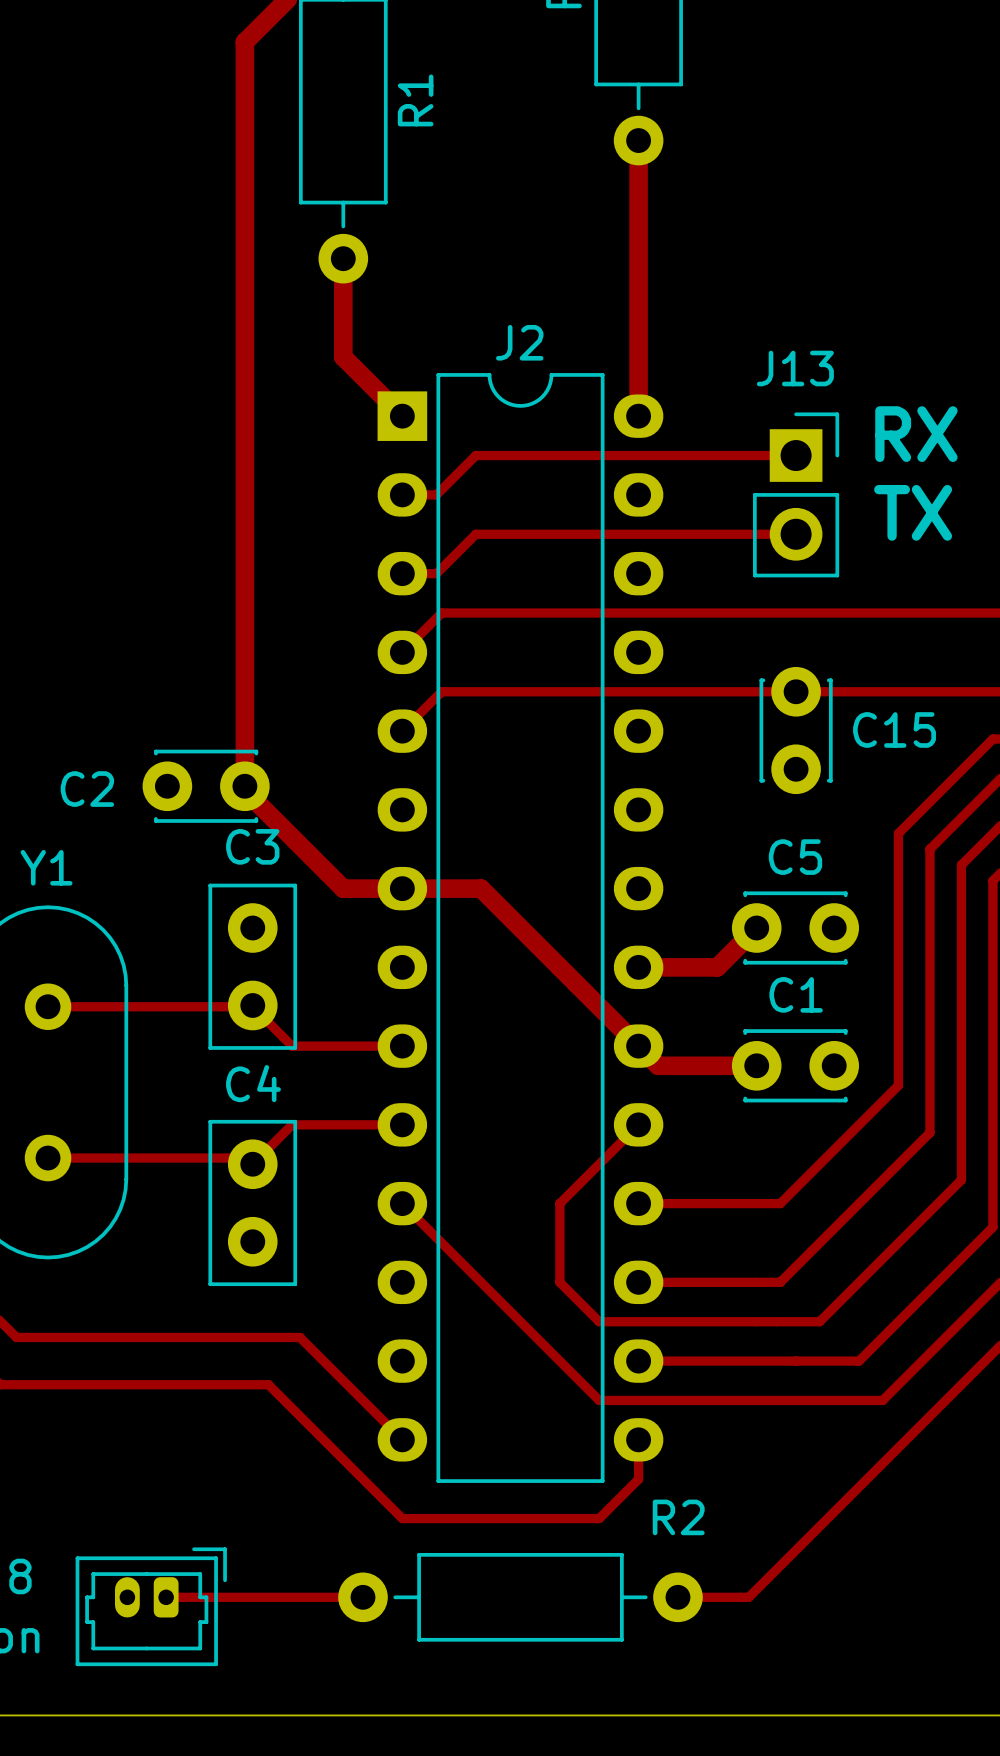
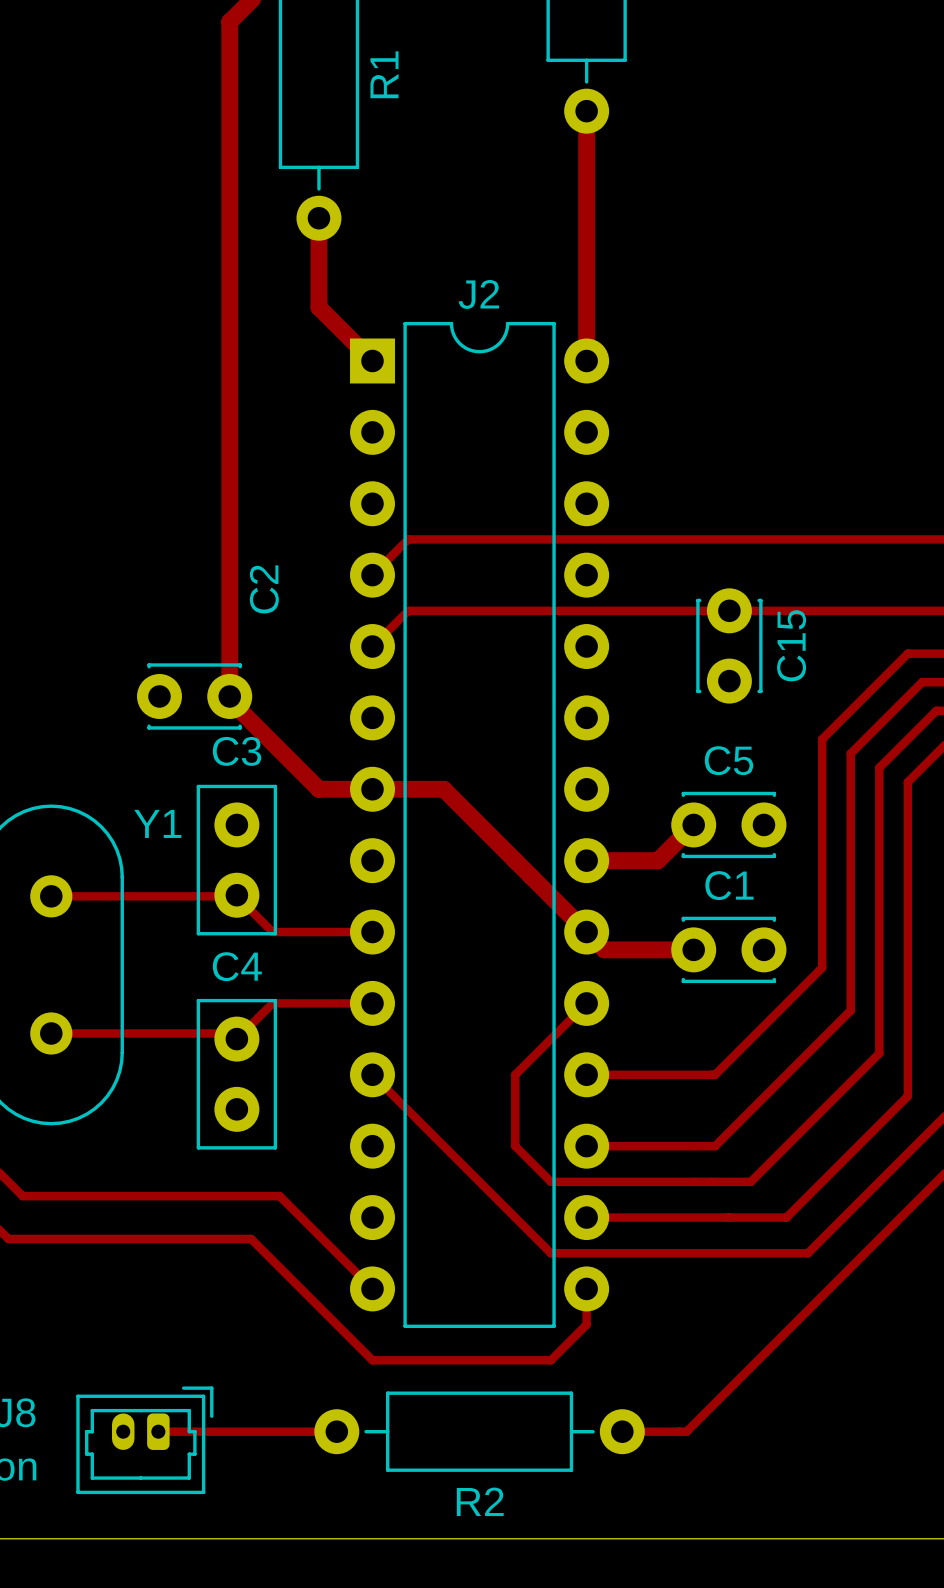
J2 footprint: [377, 373, 664, 1483] -> [350, 321, 610, 1328]
text: RX (916, 434) -> none
track: (796, 455) (475, 455) (436, 494) (402, 494) -> none
J13: (796, 494) -> none
text: TX (913, 512) -> none
track: (796, 534) (475, 534) (436, 573) (402, 573) -> none
C15 name rotation: 0° (894, 729) -> 90° counterclockwise (791, 645)
C2 name rotation: 0° (87, 789) -> 90° counterclockwise (264, 589)
C2 name position: C2 (87, 789) -> C2 (264, 589)
Y1 name position: Y1 (46, 867) -> Y1 (157, 823)
R2 name position: R2 (678, 1517) -> R2 (480, 1501)

